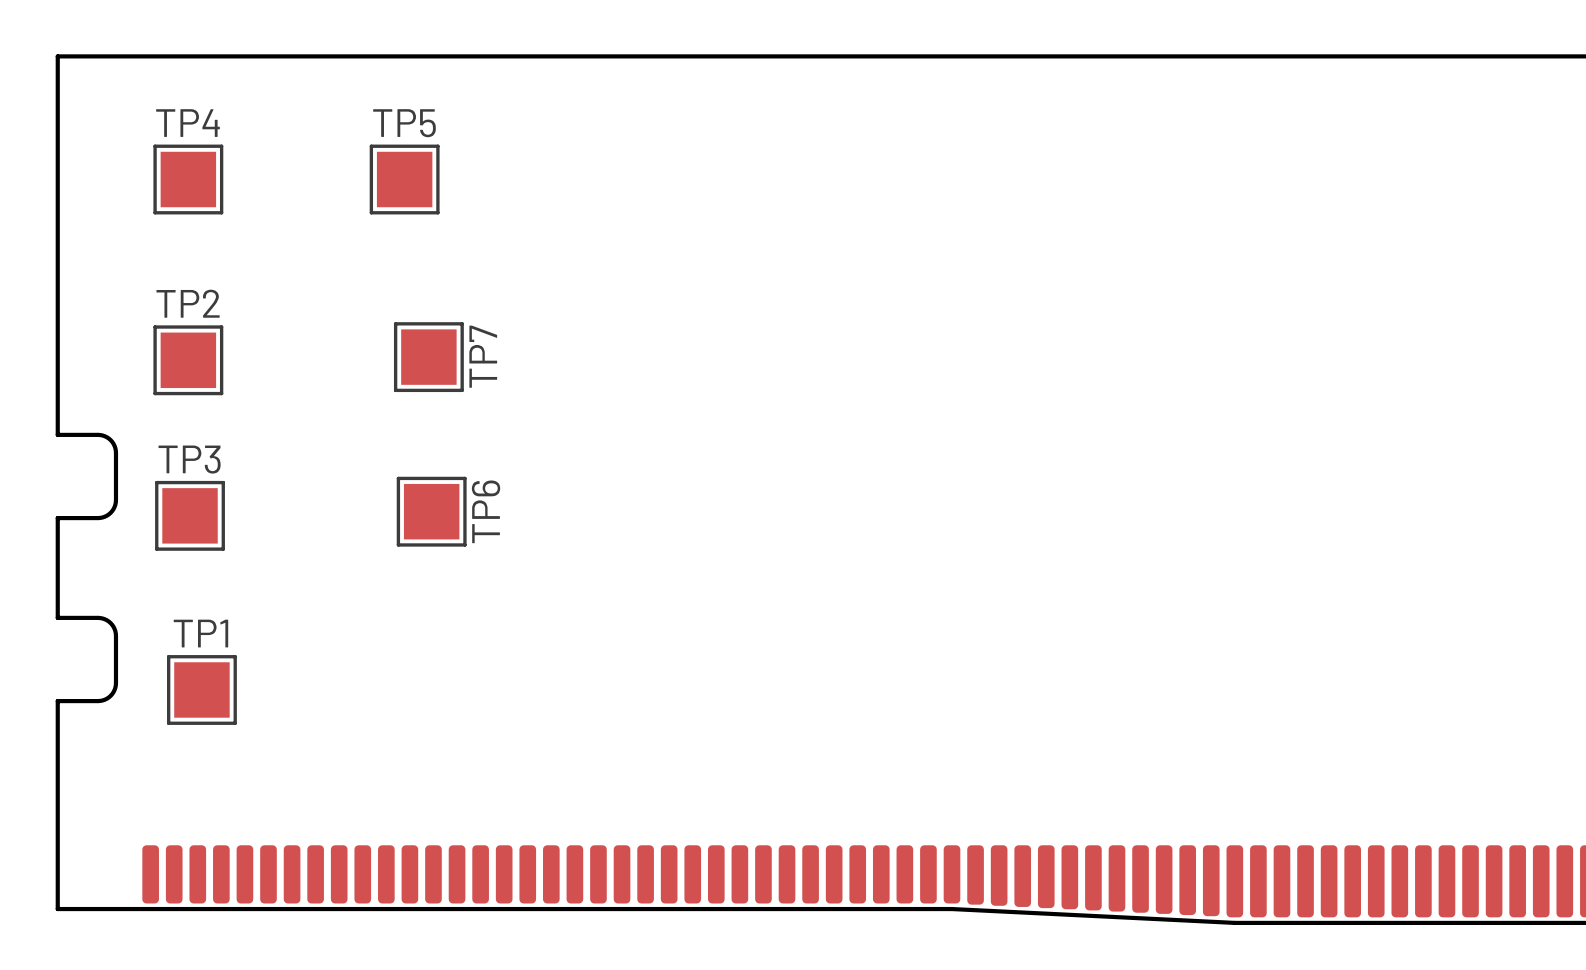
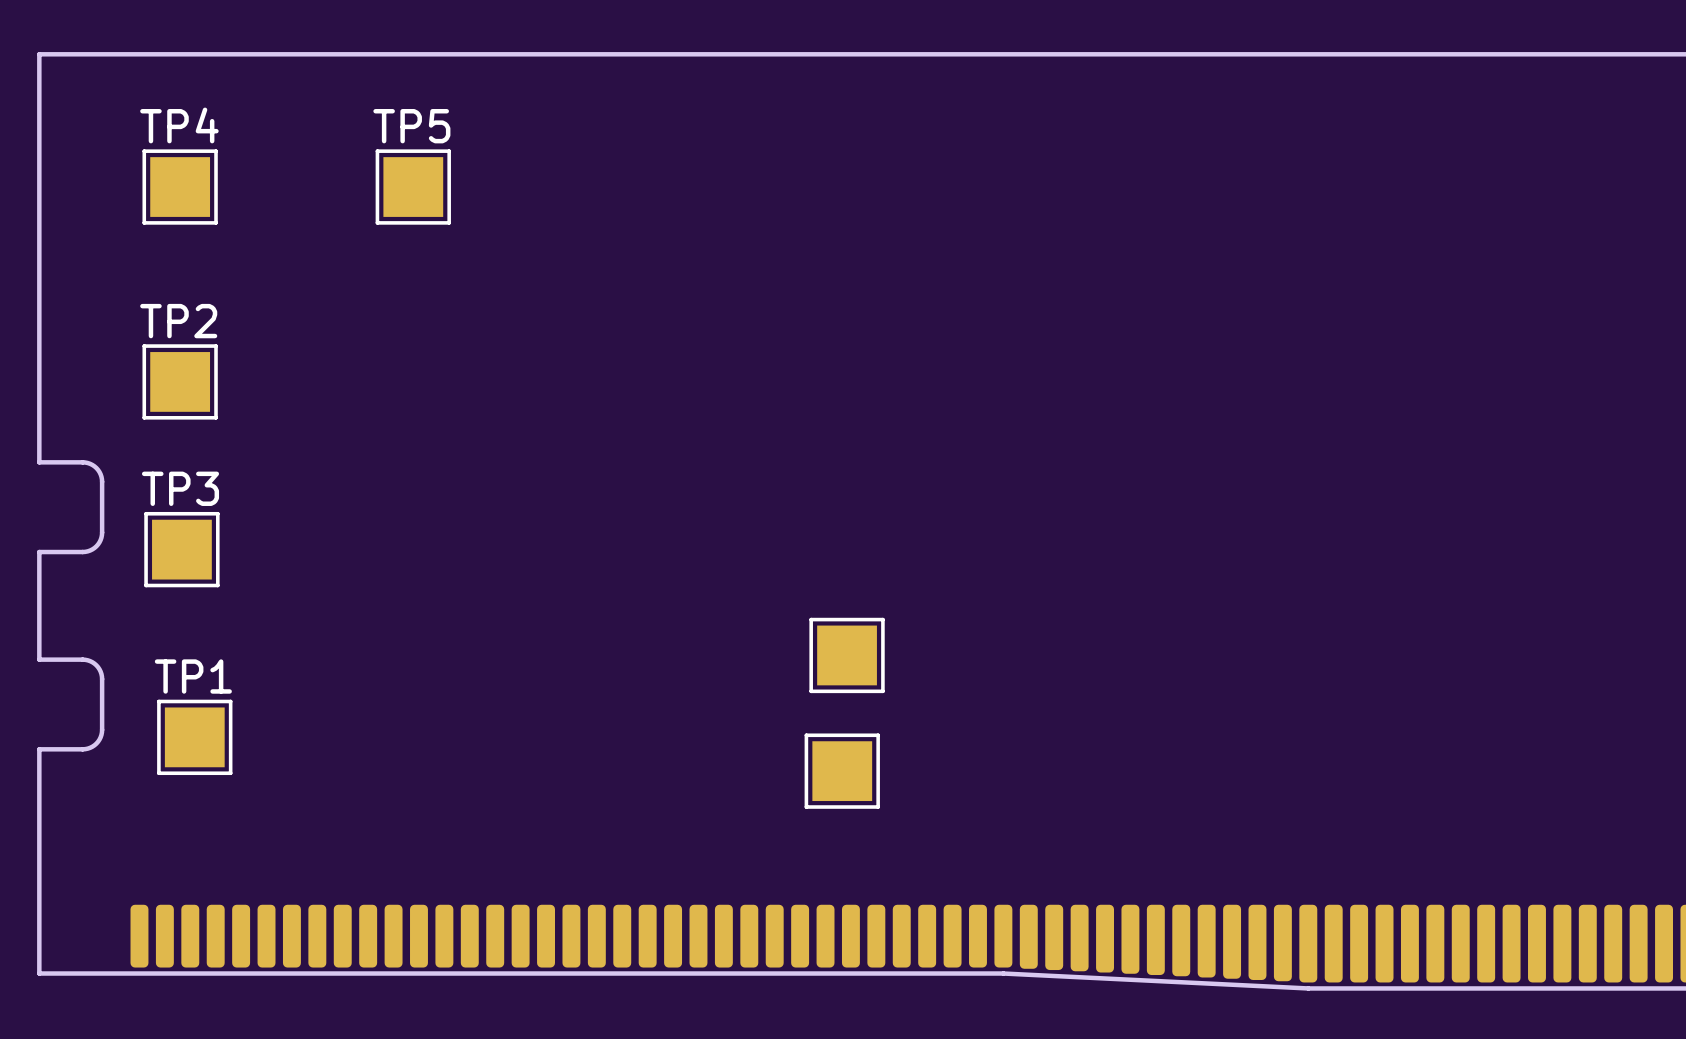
TP7: (428, 357) -> none
TP6: (431, 511) -> none
part: none -> (847, 655)
part: none -> (842, 771)

